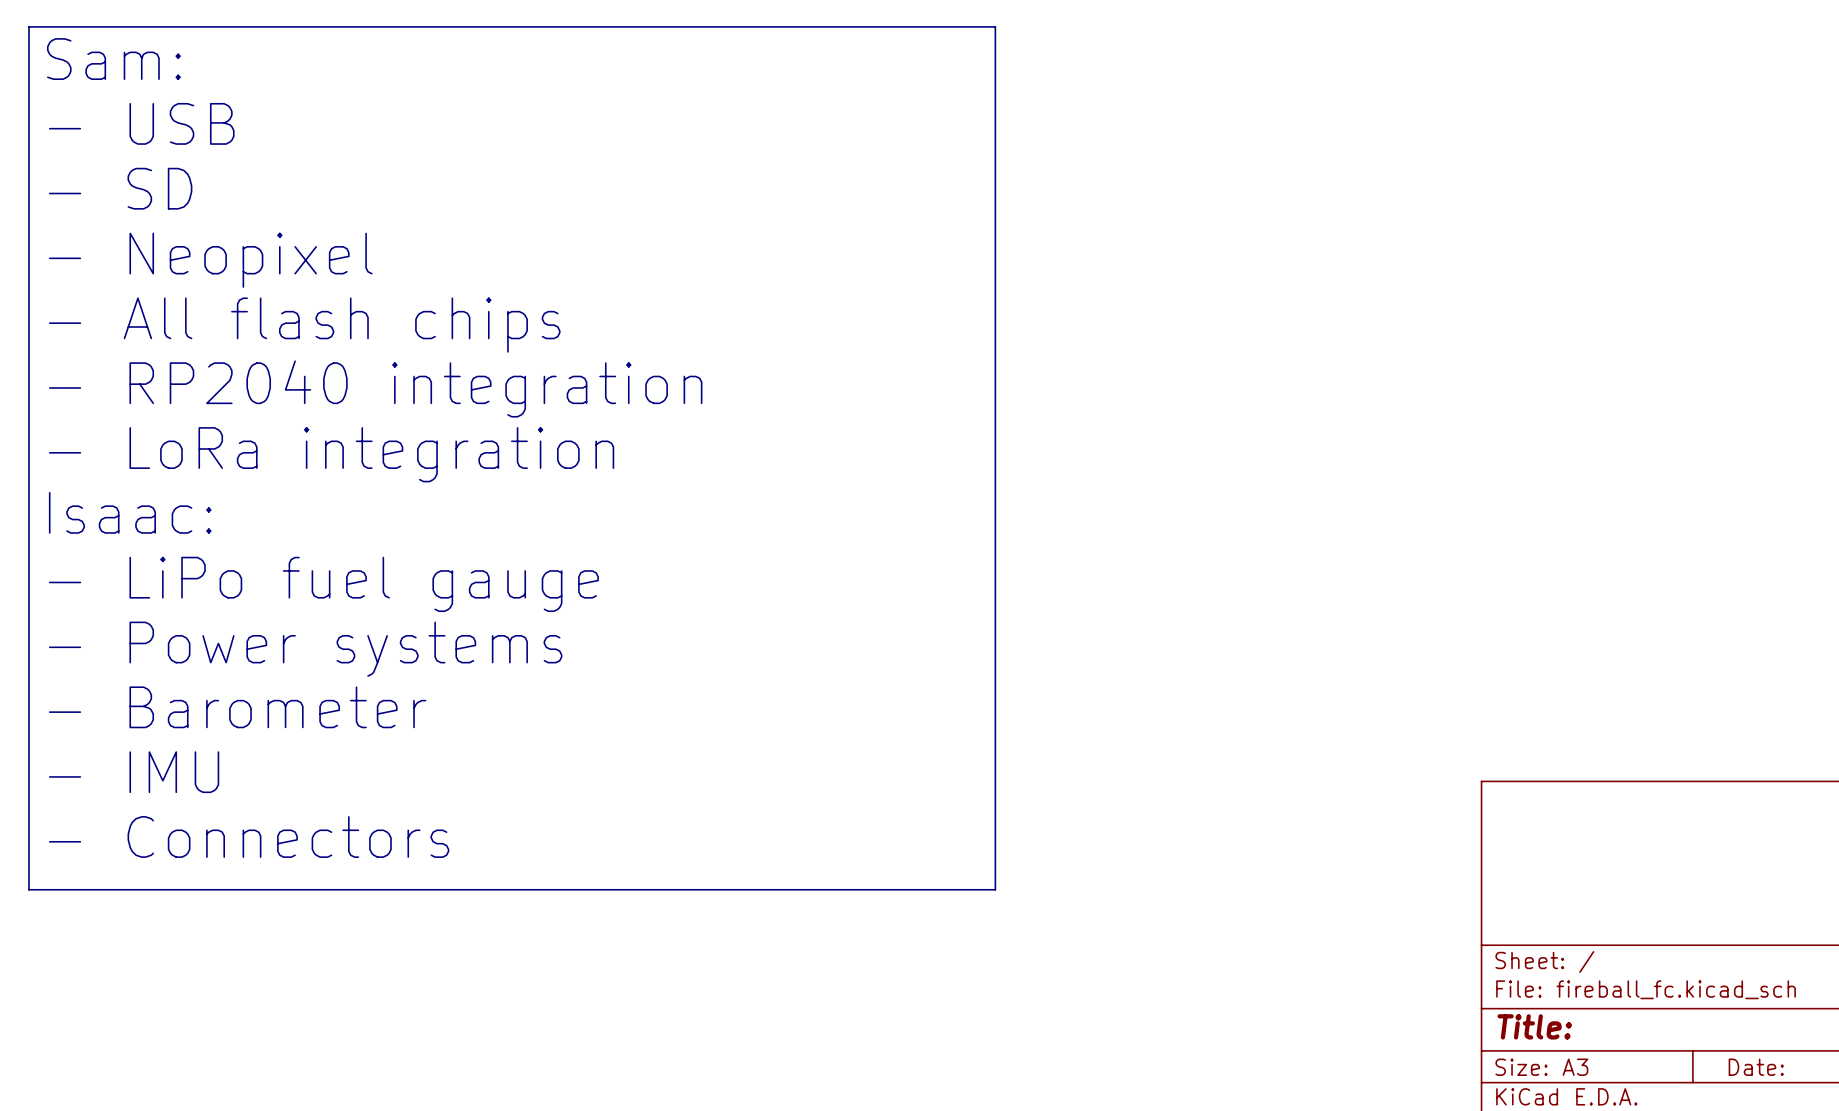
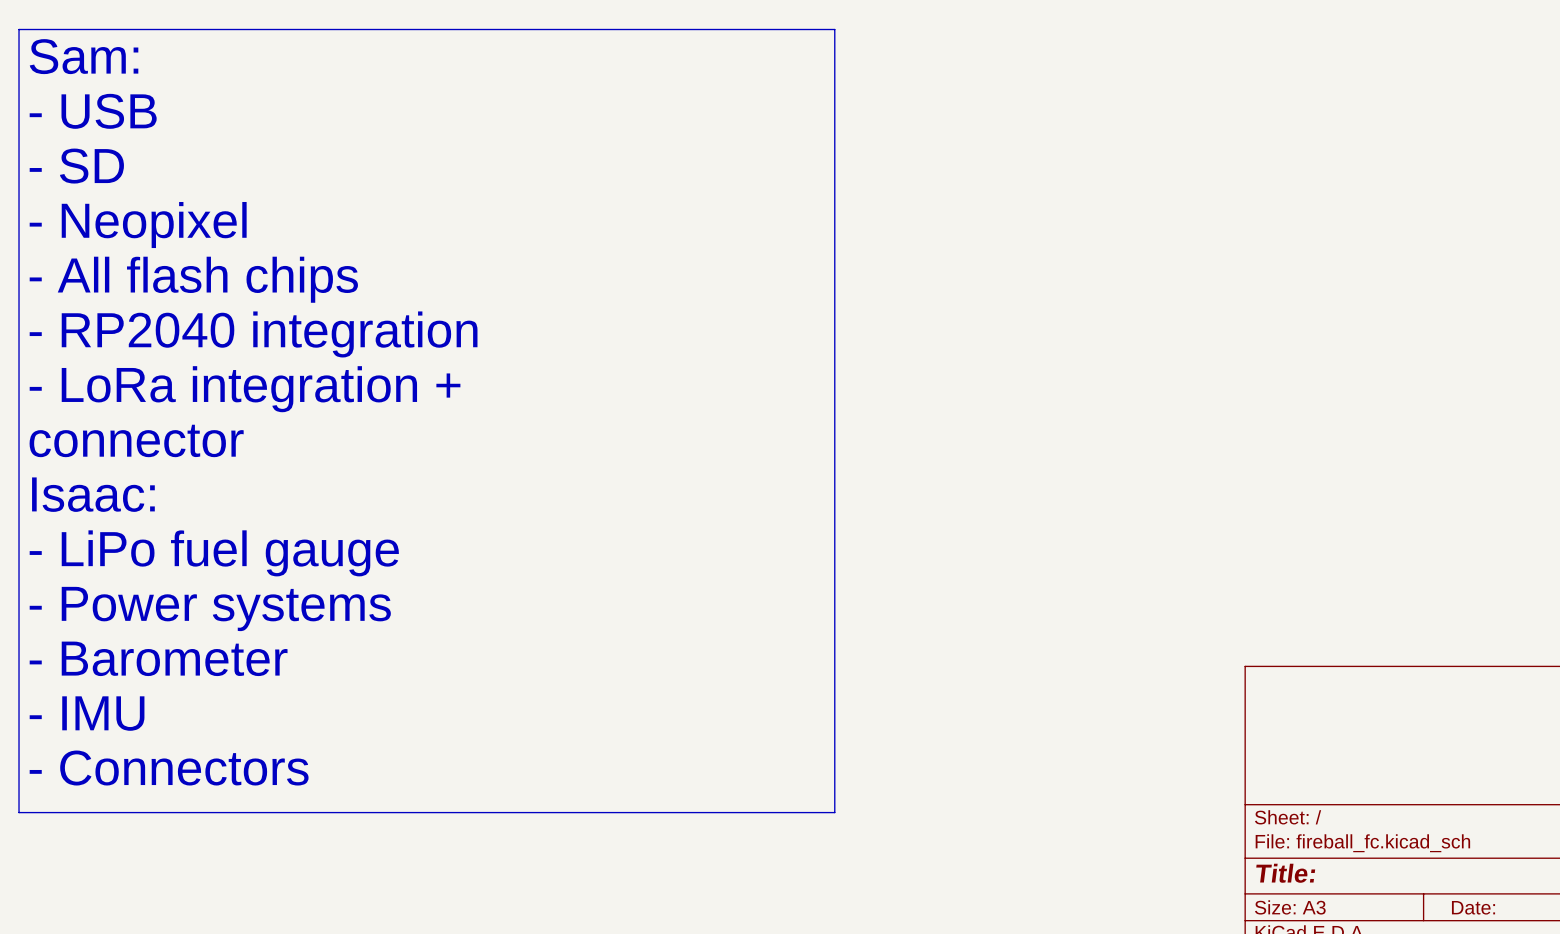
text: - LoRa integration (331, 454) -> - LoRa integration + (245, 389)
text: Isaac: (130, 512) -> connector (136, 440)
text: - LiPo fuel gauge (323, 584) -> Isaac: (93, 494)
text: - Power systems (305, 649) -> - LiPo fuel gauge (214, 553)
text: - Barometer (237, 707) -> - Power systems (210, 608)
text: - IMU (134, 772) -> - Barometer (158, 658)
text: - Connectors (249, 836) -> - IMU (87, 713)
line: (28, 889) (995, 889) -> (19, 757) (19, 812) (834, 812) (834, 757)
text: none -> - Connectors (169, 768)

